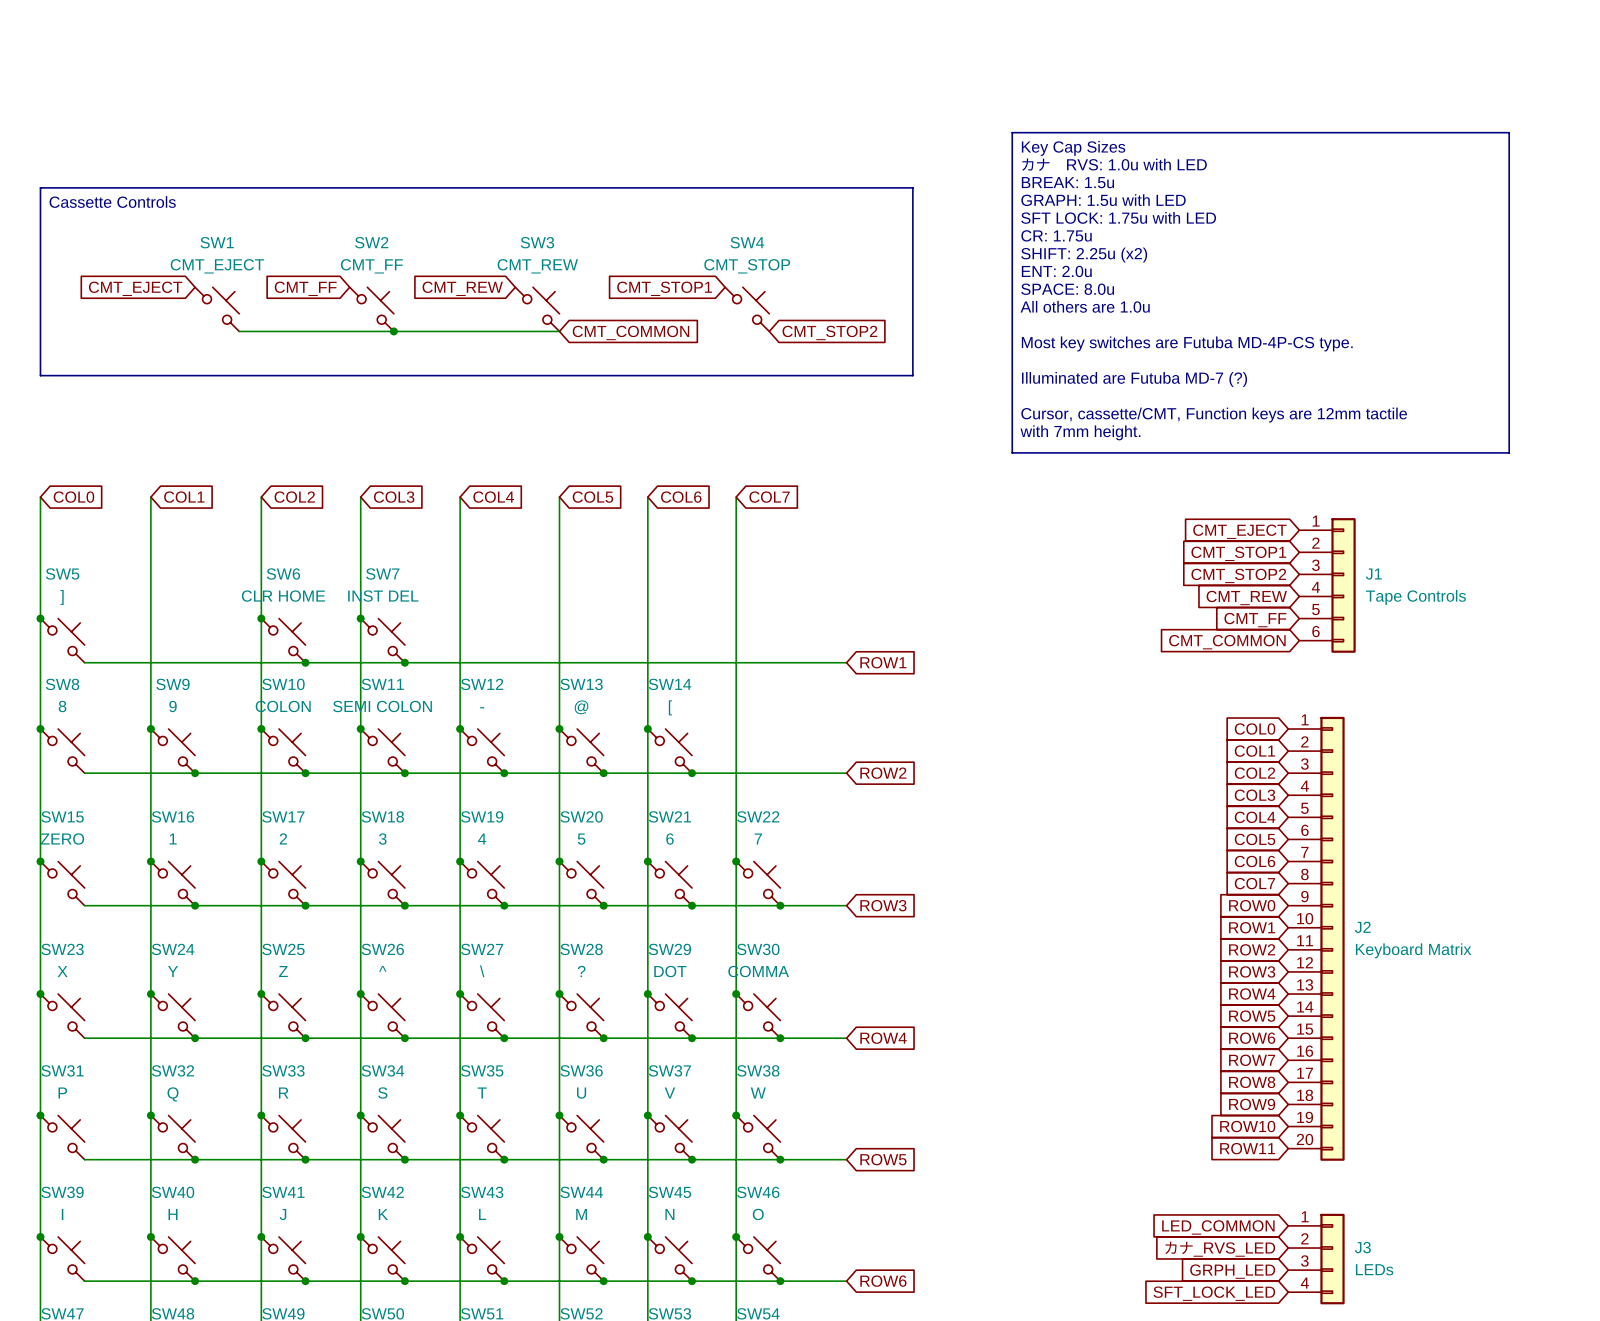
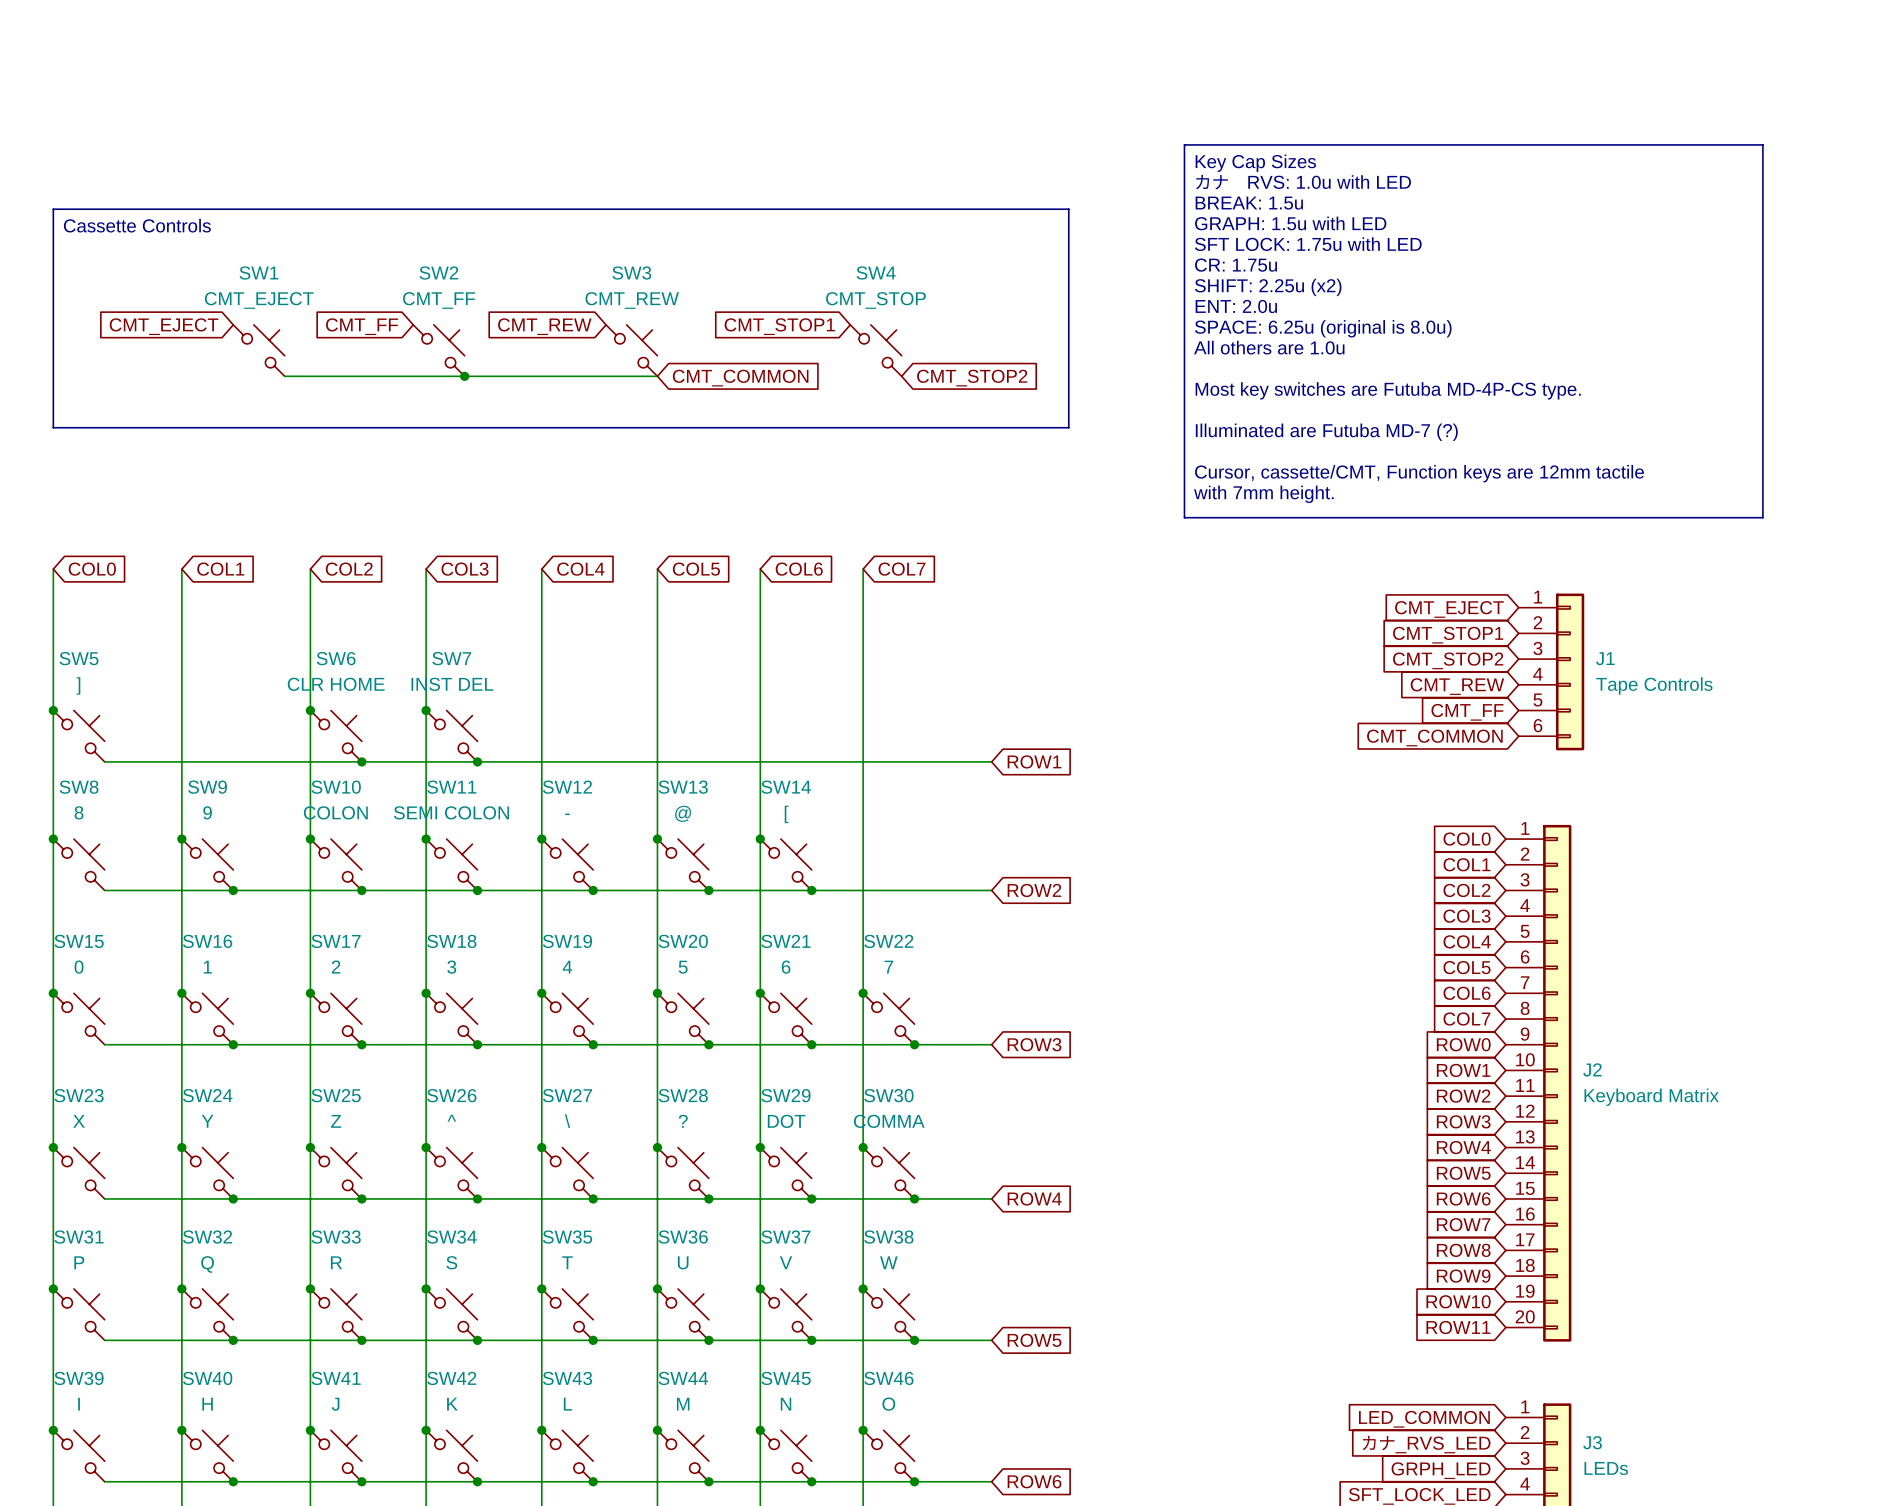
text: SPACE: 8.0u (1067, 289) -> SPACE: 6.25u (original is 8.0u) (1323, 328)
SW15 value: ZERO (62, 839) -> 0 (79, 967)

